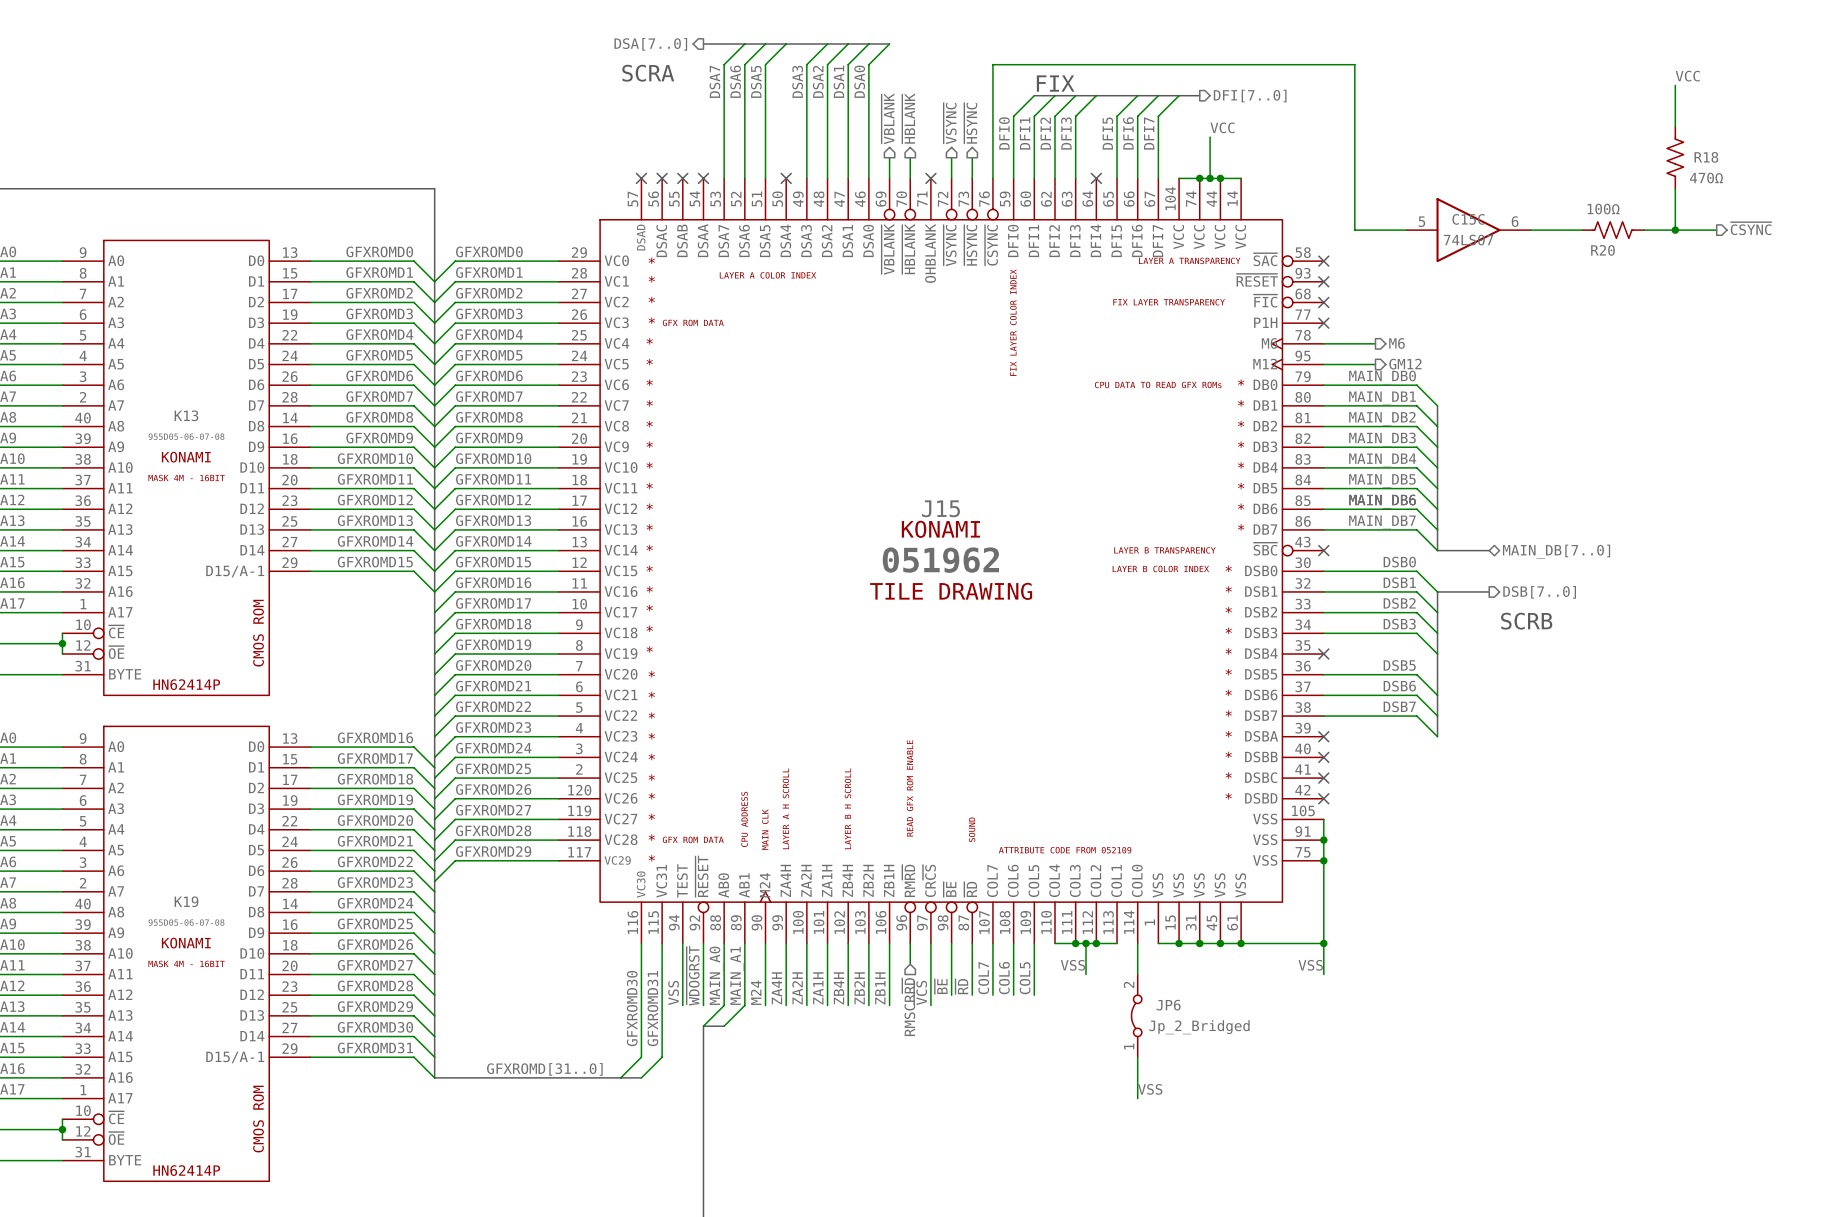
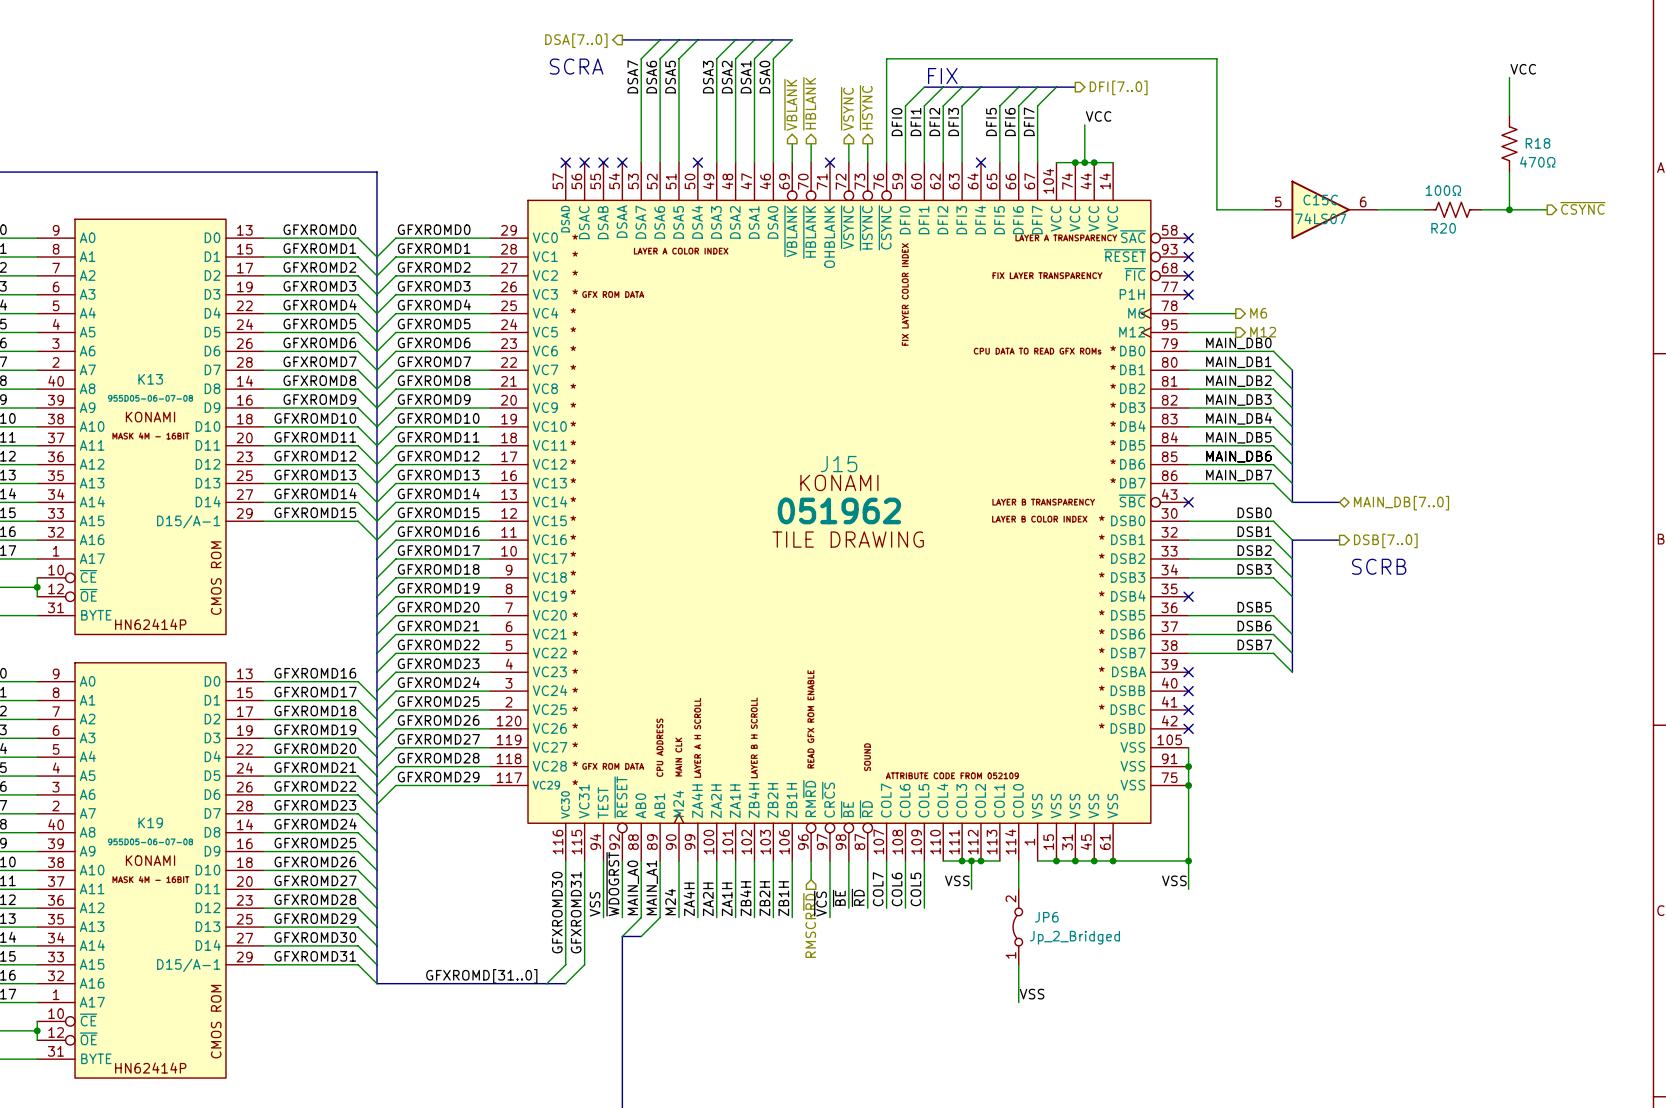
hierarchical label: GM12 (1405, 364) -> M12 (1263, 332)

